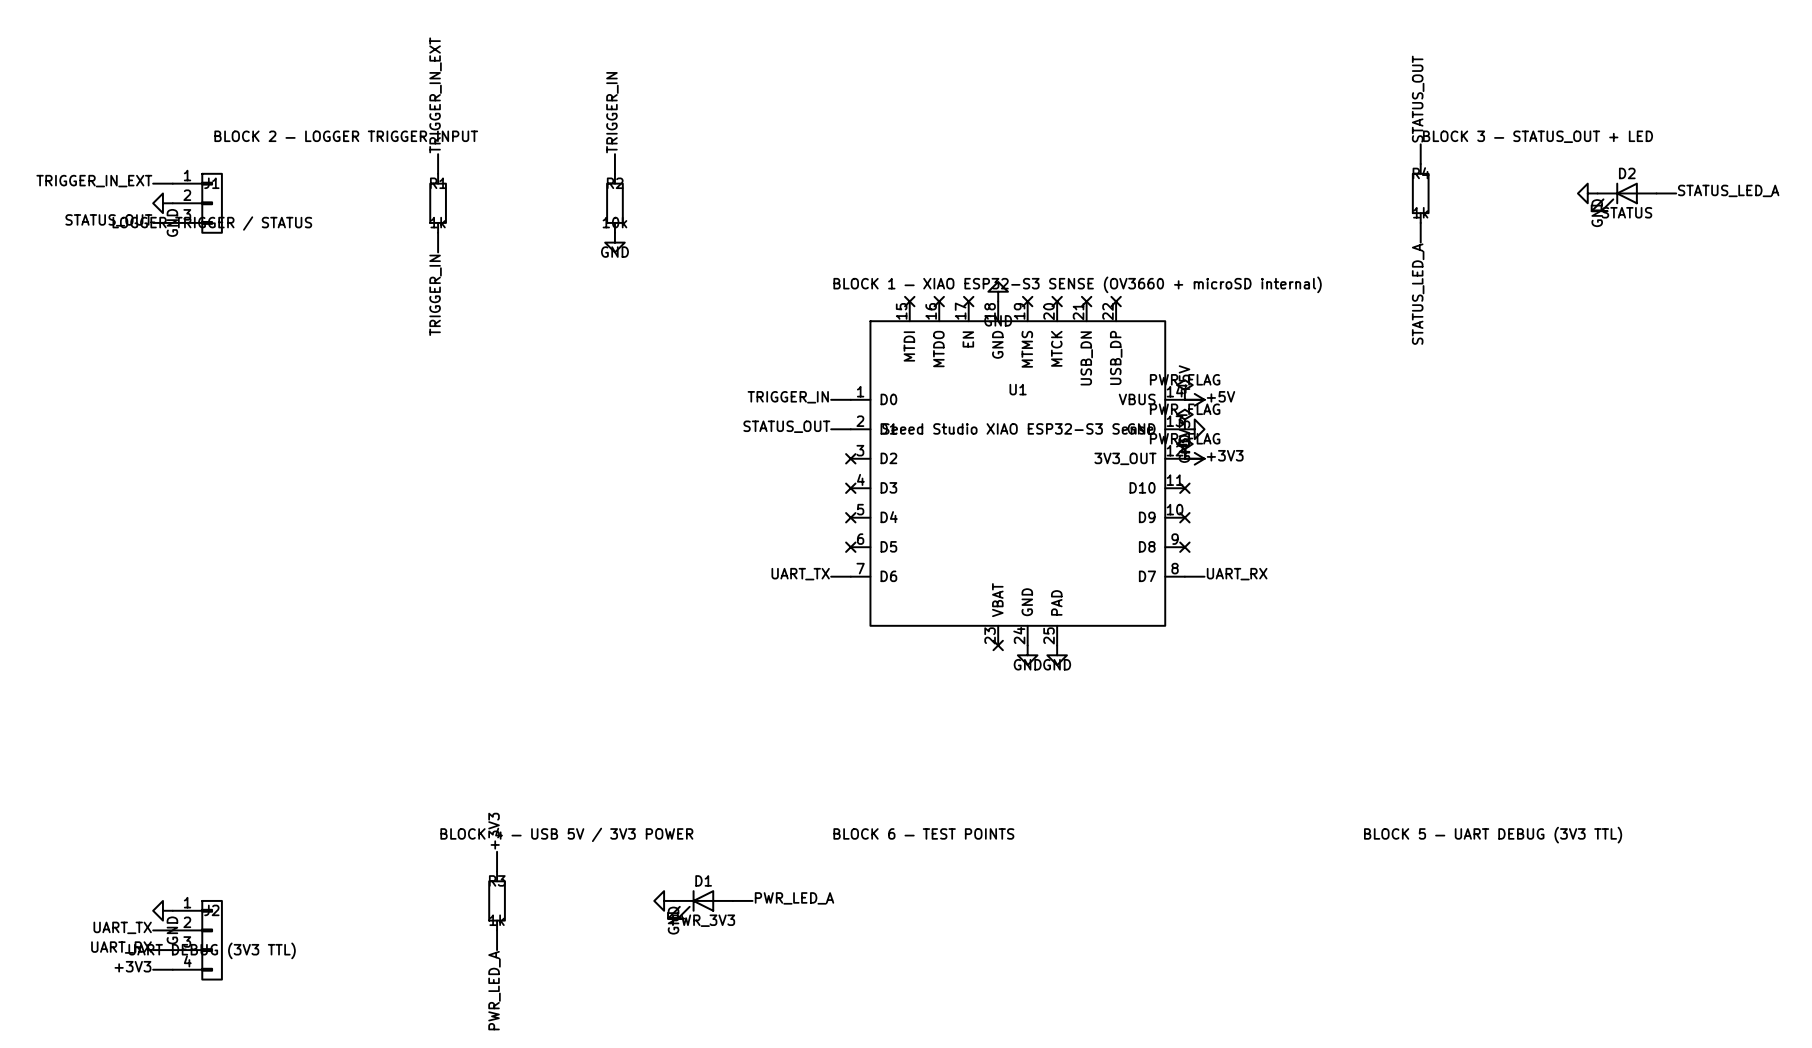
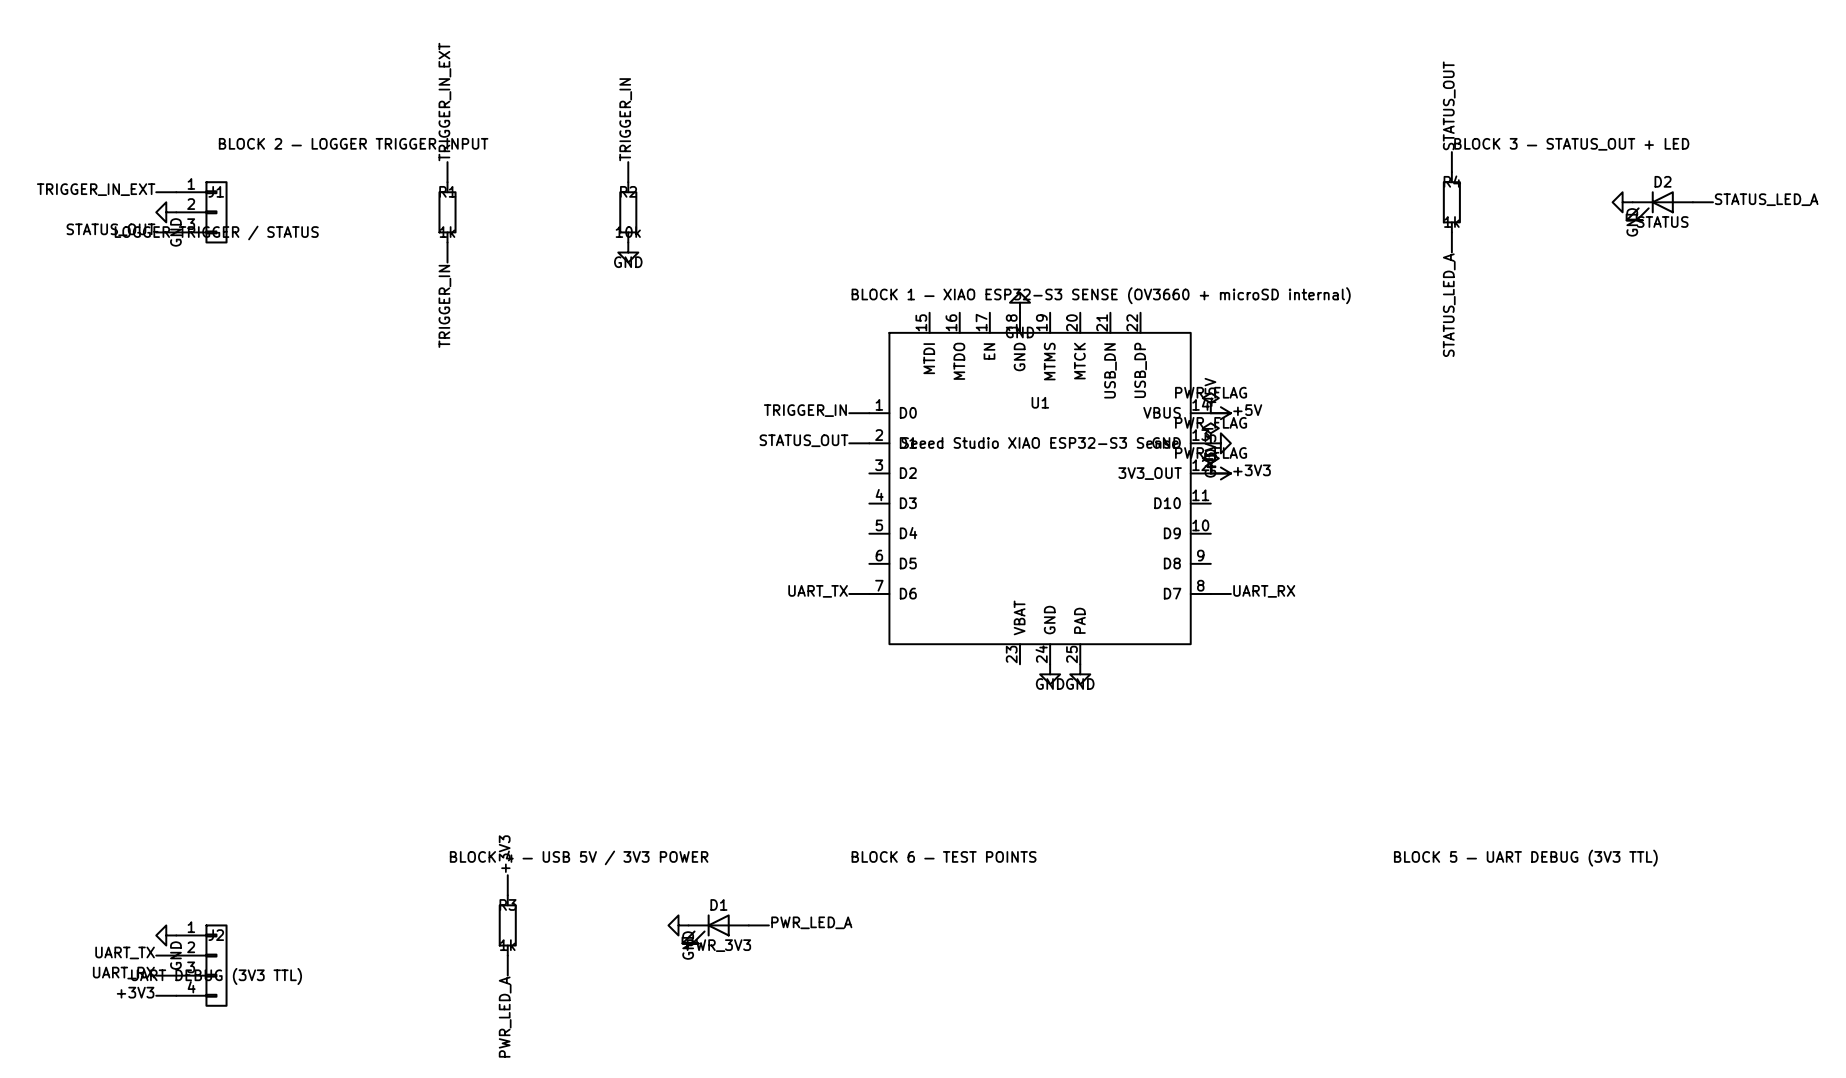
no-connect mark: (909, 301) -> none
no-connect mark: (939, 301) -> none
no-connect mark: (968, 301) -> none
no-connect mark: (1027, 301) -> none
no-connect mark: (1057, 301) -> none
no-connect mark: (1086, 301) -> none
no-connect mark: (1116, 301) -> none
no-connect mark: (850, 458) -> none
no-connect mark: (850, 488) -> none
no-connect mark: (1184, 488) -> none
no-connect mark: (850, 517) -> none
no-connect mark: (1184, 517) -> none
no-connect mark: (850, 547) -> none
no-connect mark: (1184, 547) -> none
no-connect mark: (998, 645) -> none

